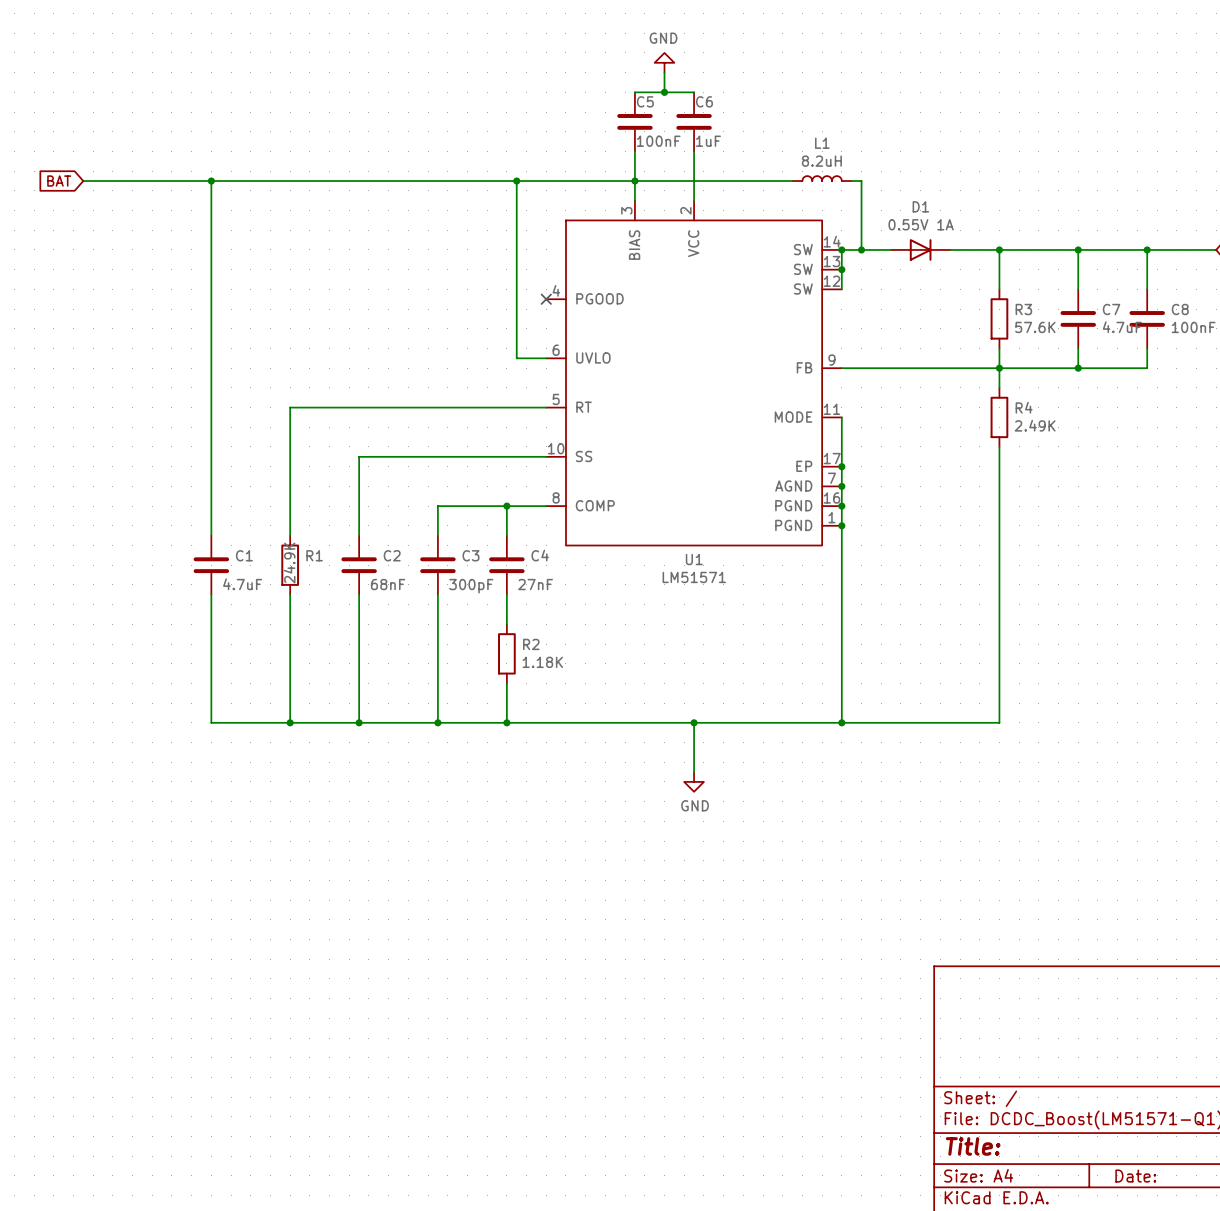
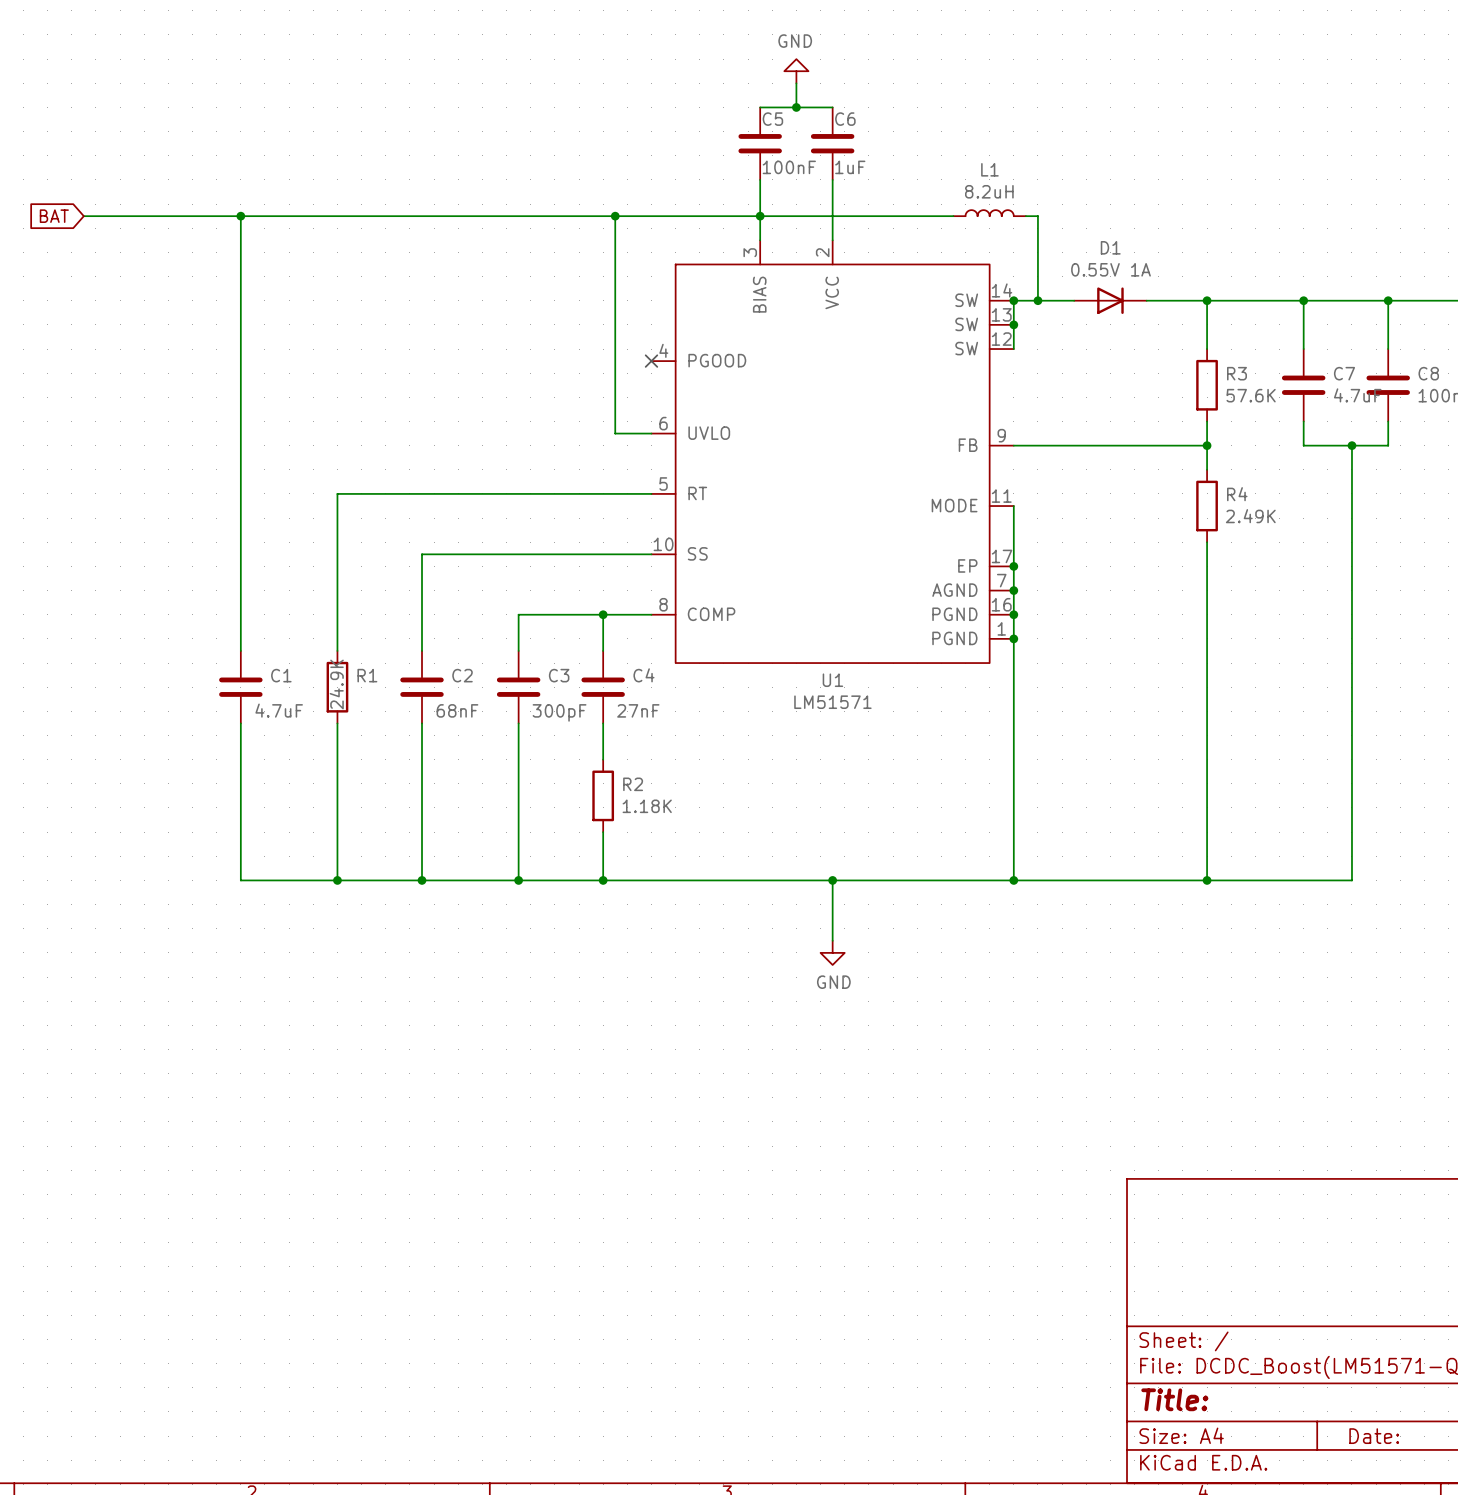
wire: (999, 368) (1078, 368) -> none
junction position: (1078, 368) -> (1351, 445)
wire: none -> (1351, 445) (1351, 880) (1207, 880)
junction: none -> (1207, 880)

